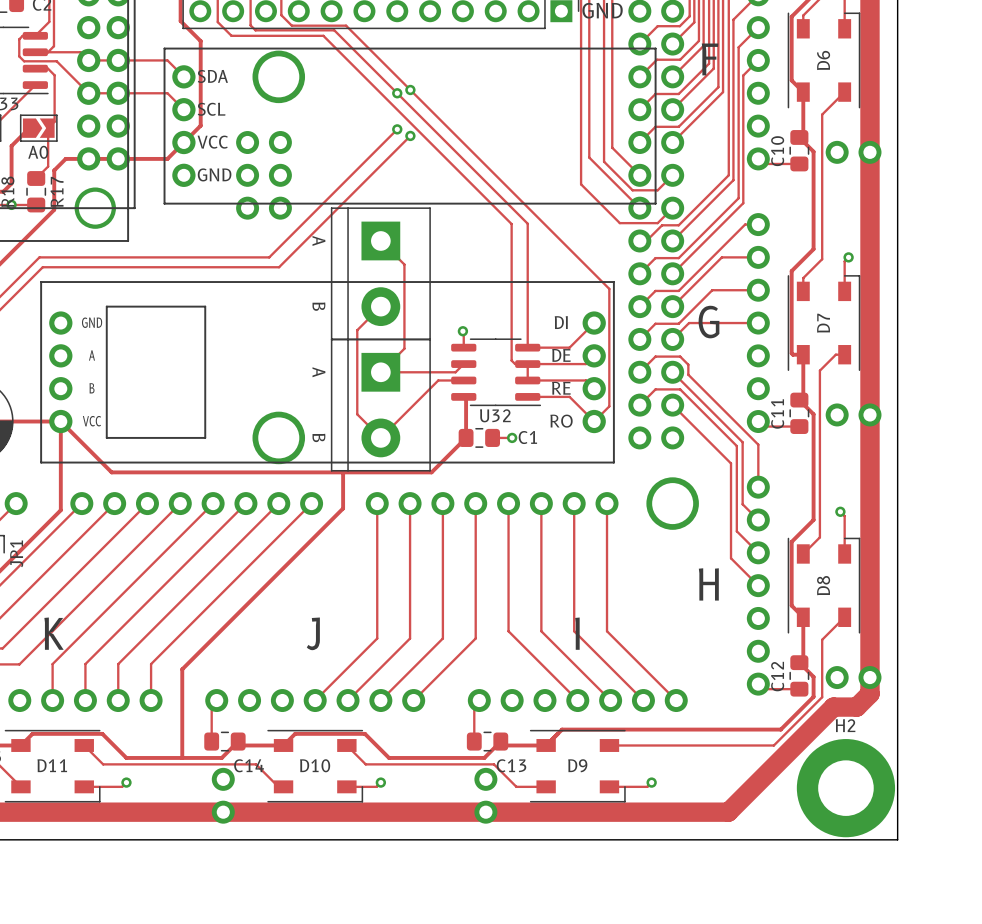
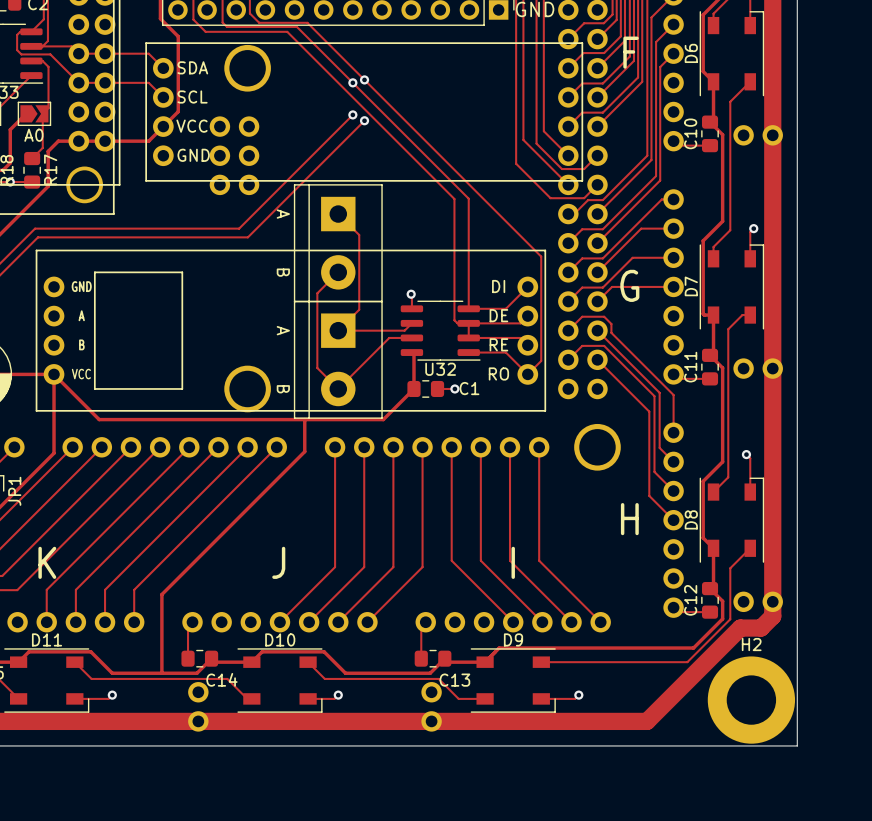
D6 name position: D6 (823, 60) -> D6 (691, 53)
D7 name position: D7 (823, 323) -> D7 (691, 286)
D8 name position: D8 (823, 585) -> D8 (691, 519)
D11 name position: D11 (52, 765) -> D11 (47, 639)
D10 name position: D10 (315, 765) -> D10 (280, 639)
D9 name position: D9 (577, 765) -> D9 (513, 639)

